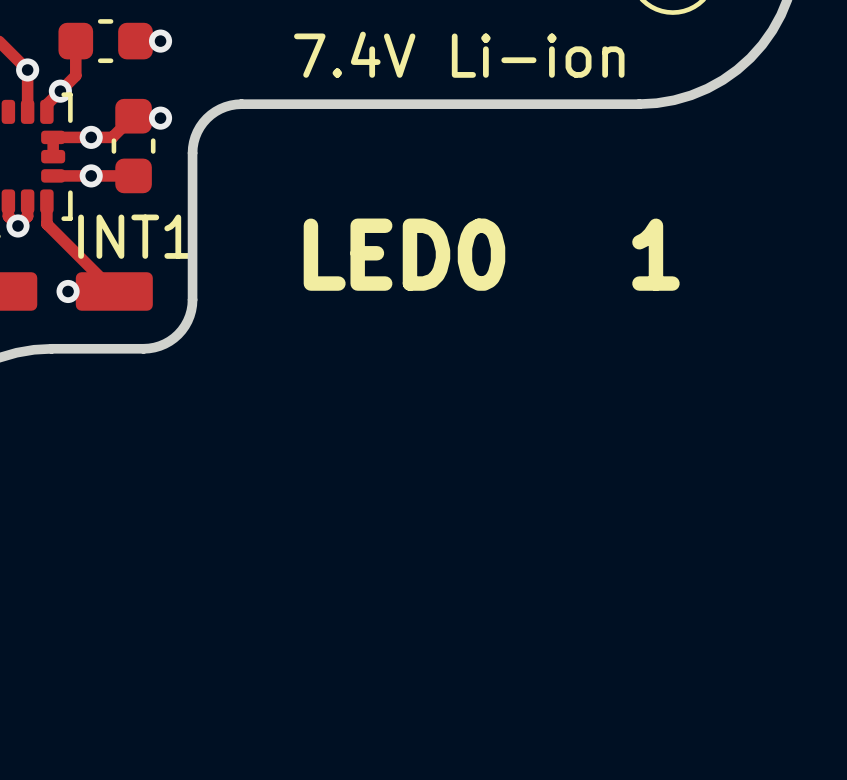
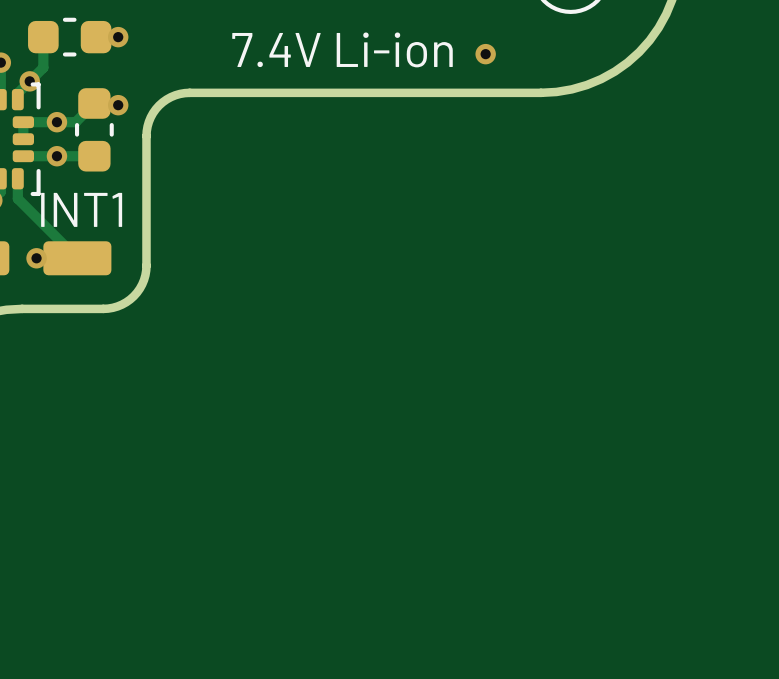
via: none -> (485, 54)
text: LED0 (404, 254) -> none
text: 1 (655, 254) -> none

